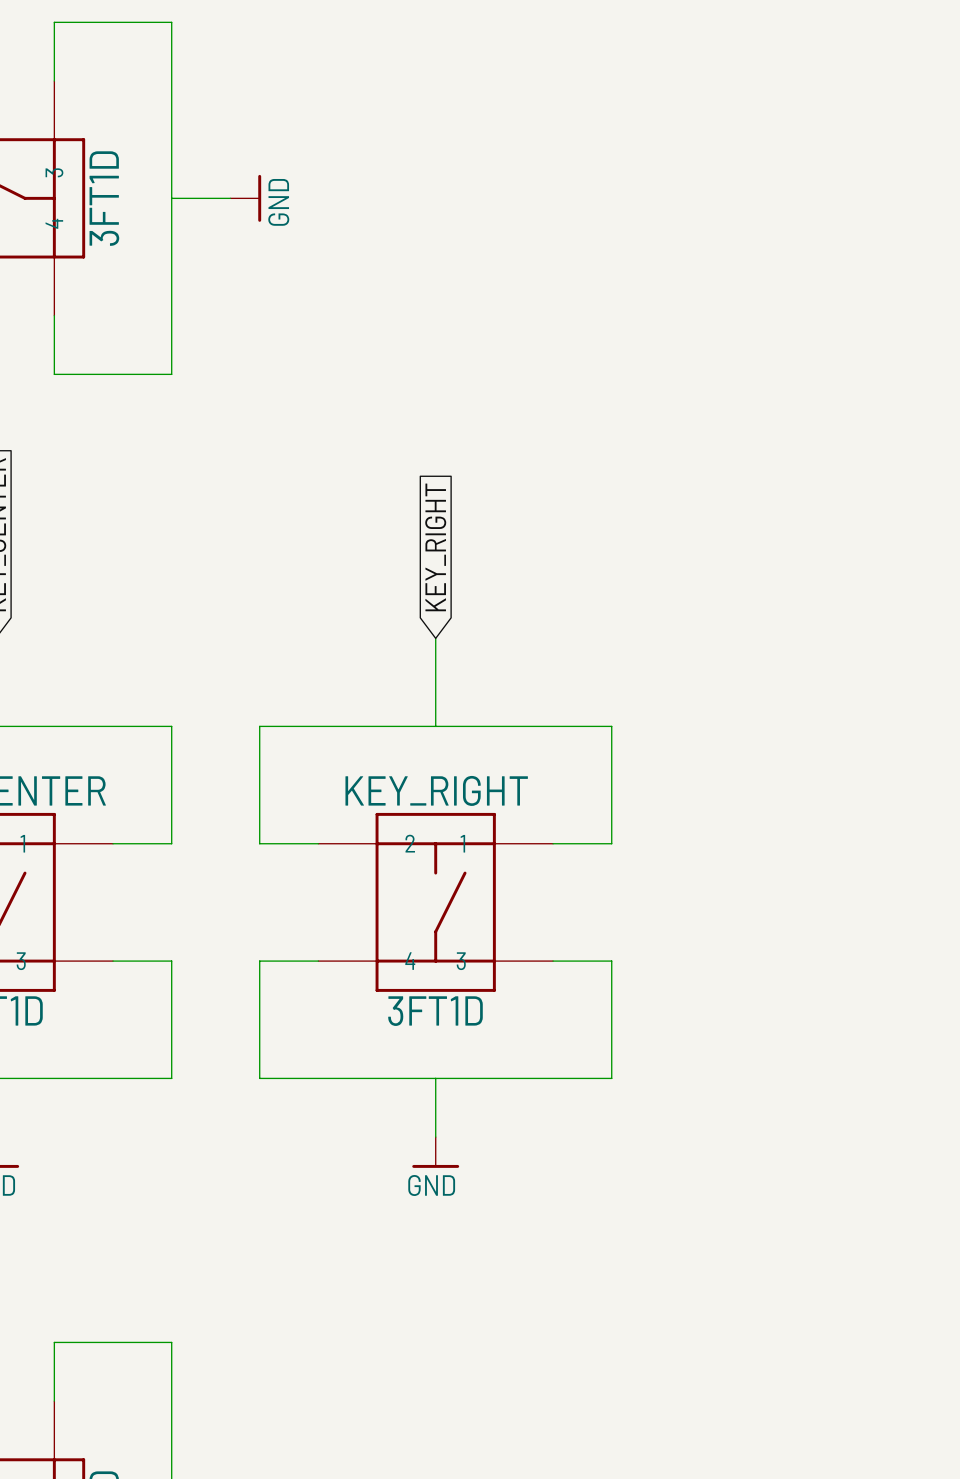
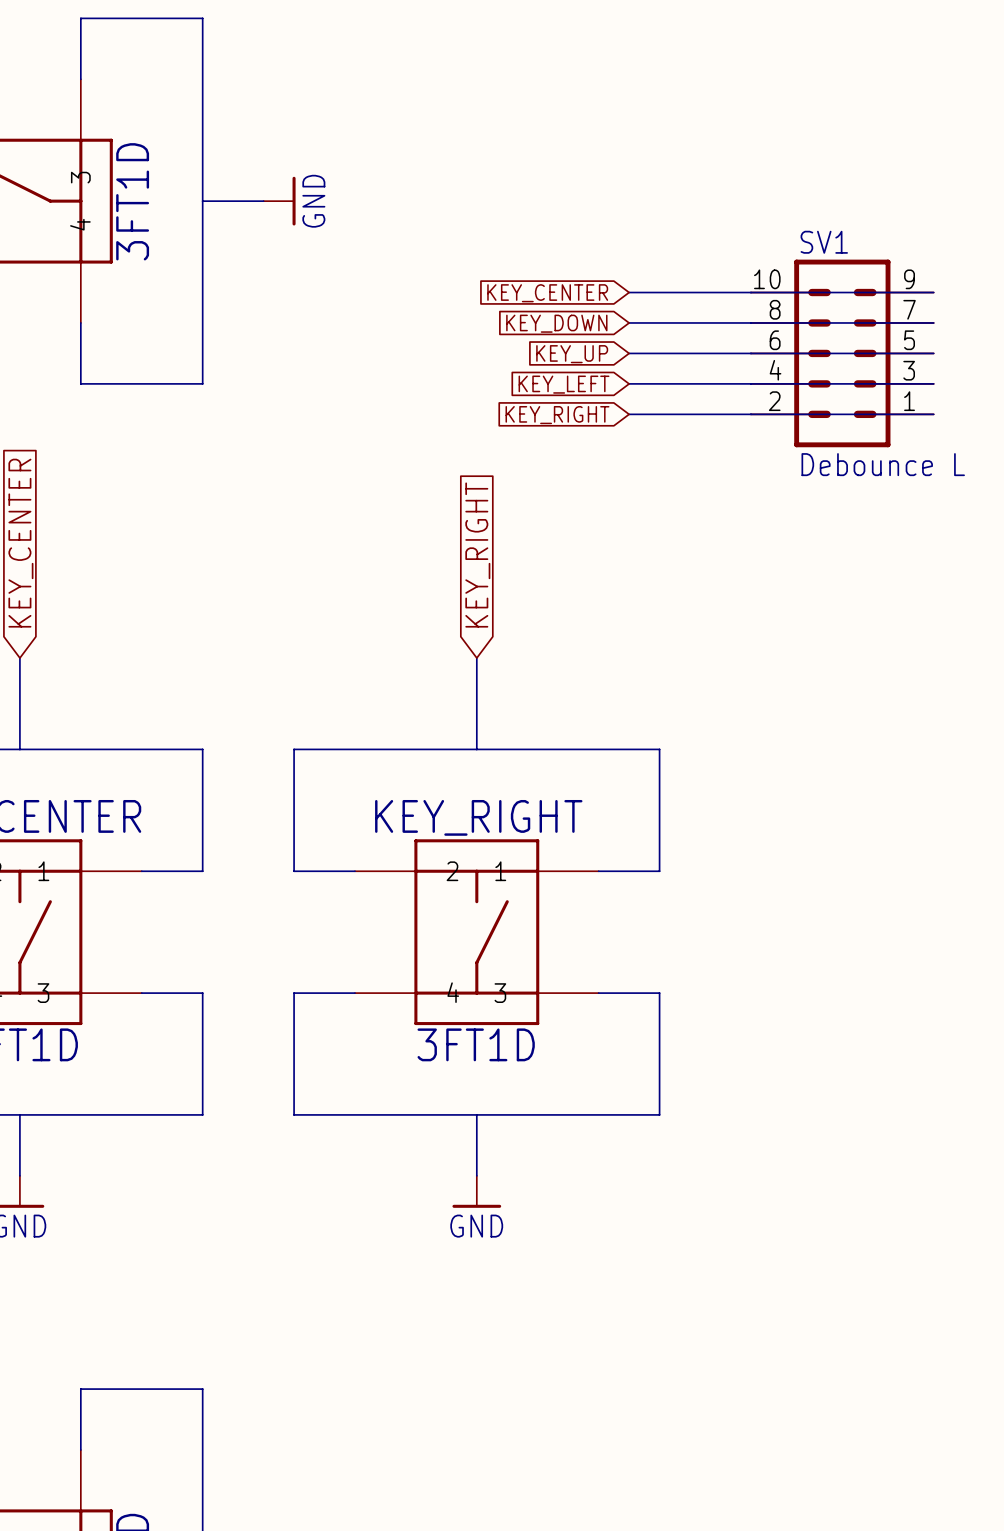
global label: none -> KEY_CENTER (547, 293)
wire: none -> (629, 292) (933, 292)
global label: none -> KEY_DOWN (556, 323)
wire: none -> (629, 322) (933, 322)
global label: none -> KEY_UP (572, 354)
wire: none -> (629, 353) (933, 353)
SV1: none -> Debounce L (842, 353)
global label: none -> KEY_LEFT (564, 384)
wire: none -> (629, 383) (933, 383)
global label: none -> KEY_RIGHT (557, 415)
wire: none -> (629, 414) (933, 414)

